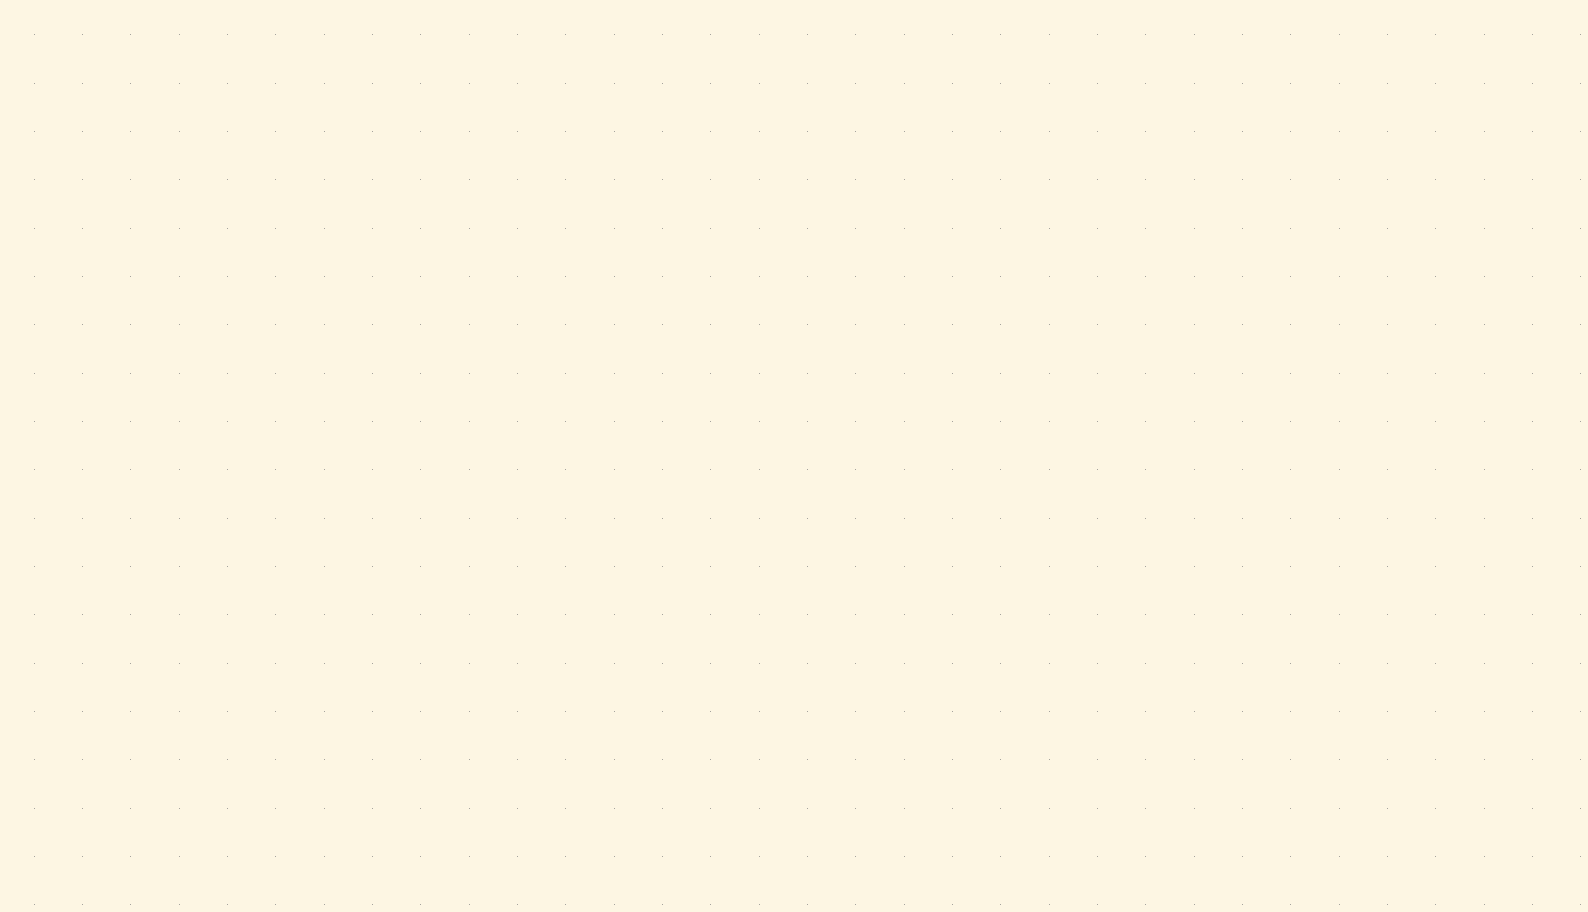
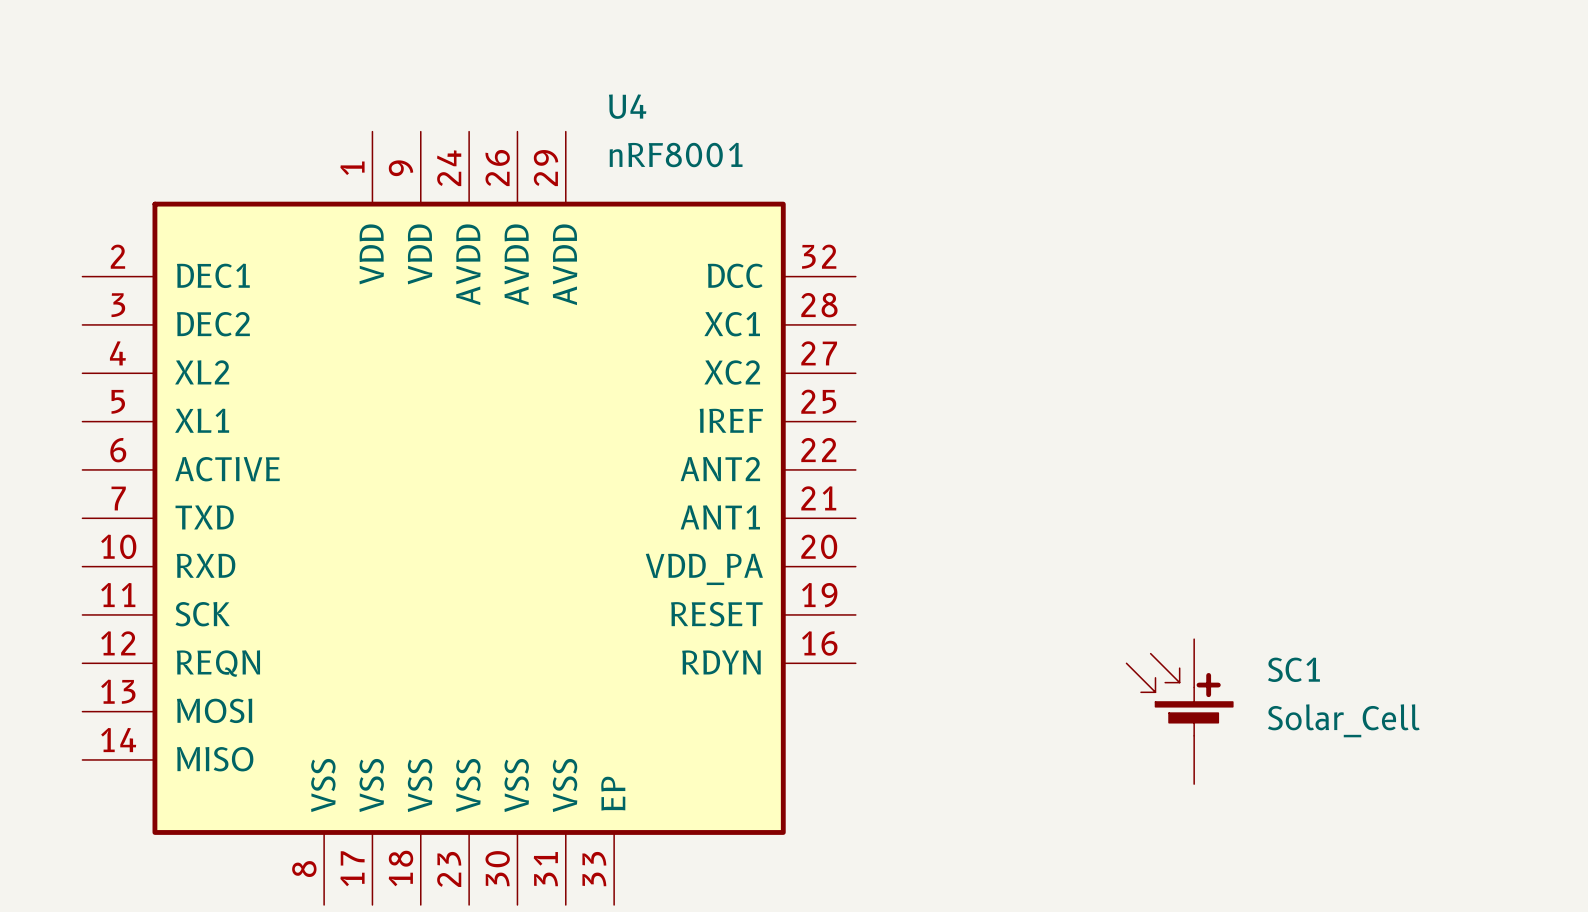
U4: none -> nRF8001 (469, 518)
SC1: none -> Solar_Cell (1179, 711)

